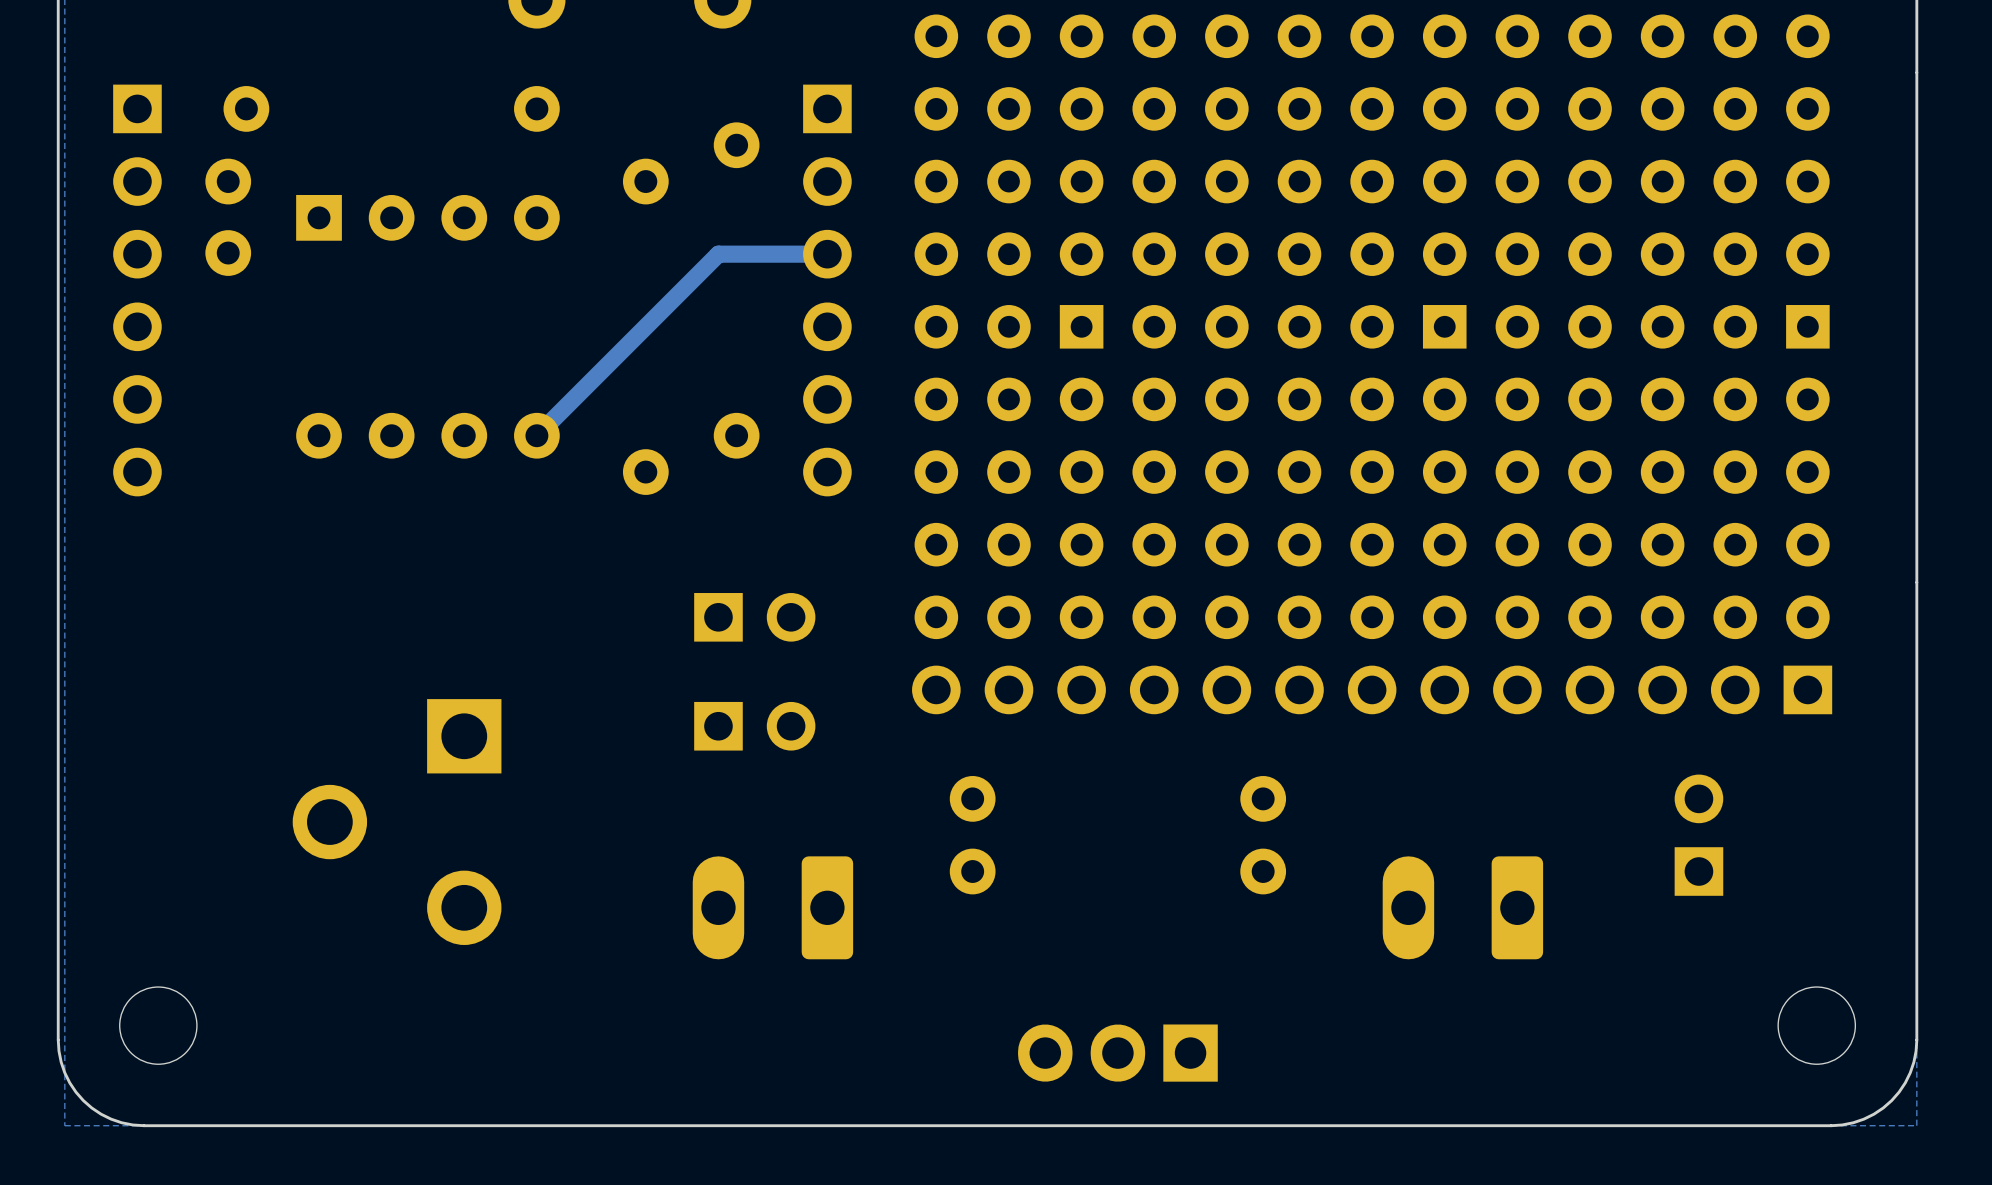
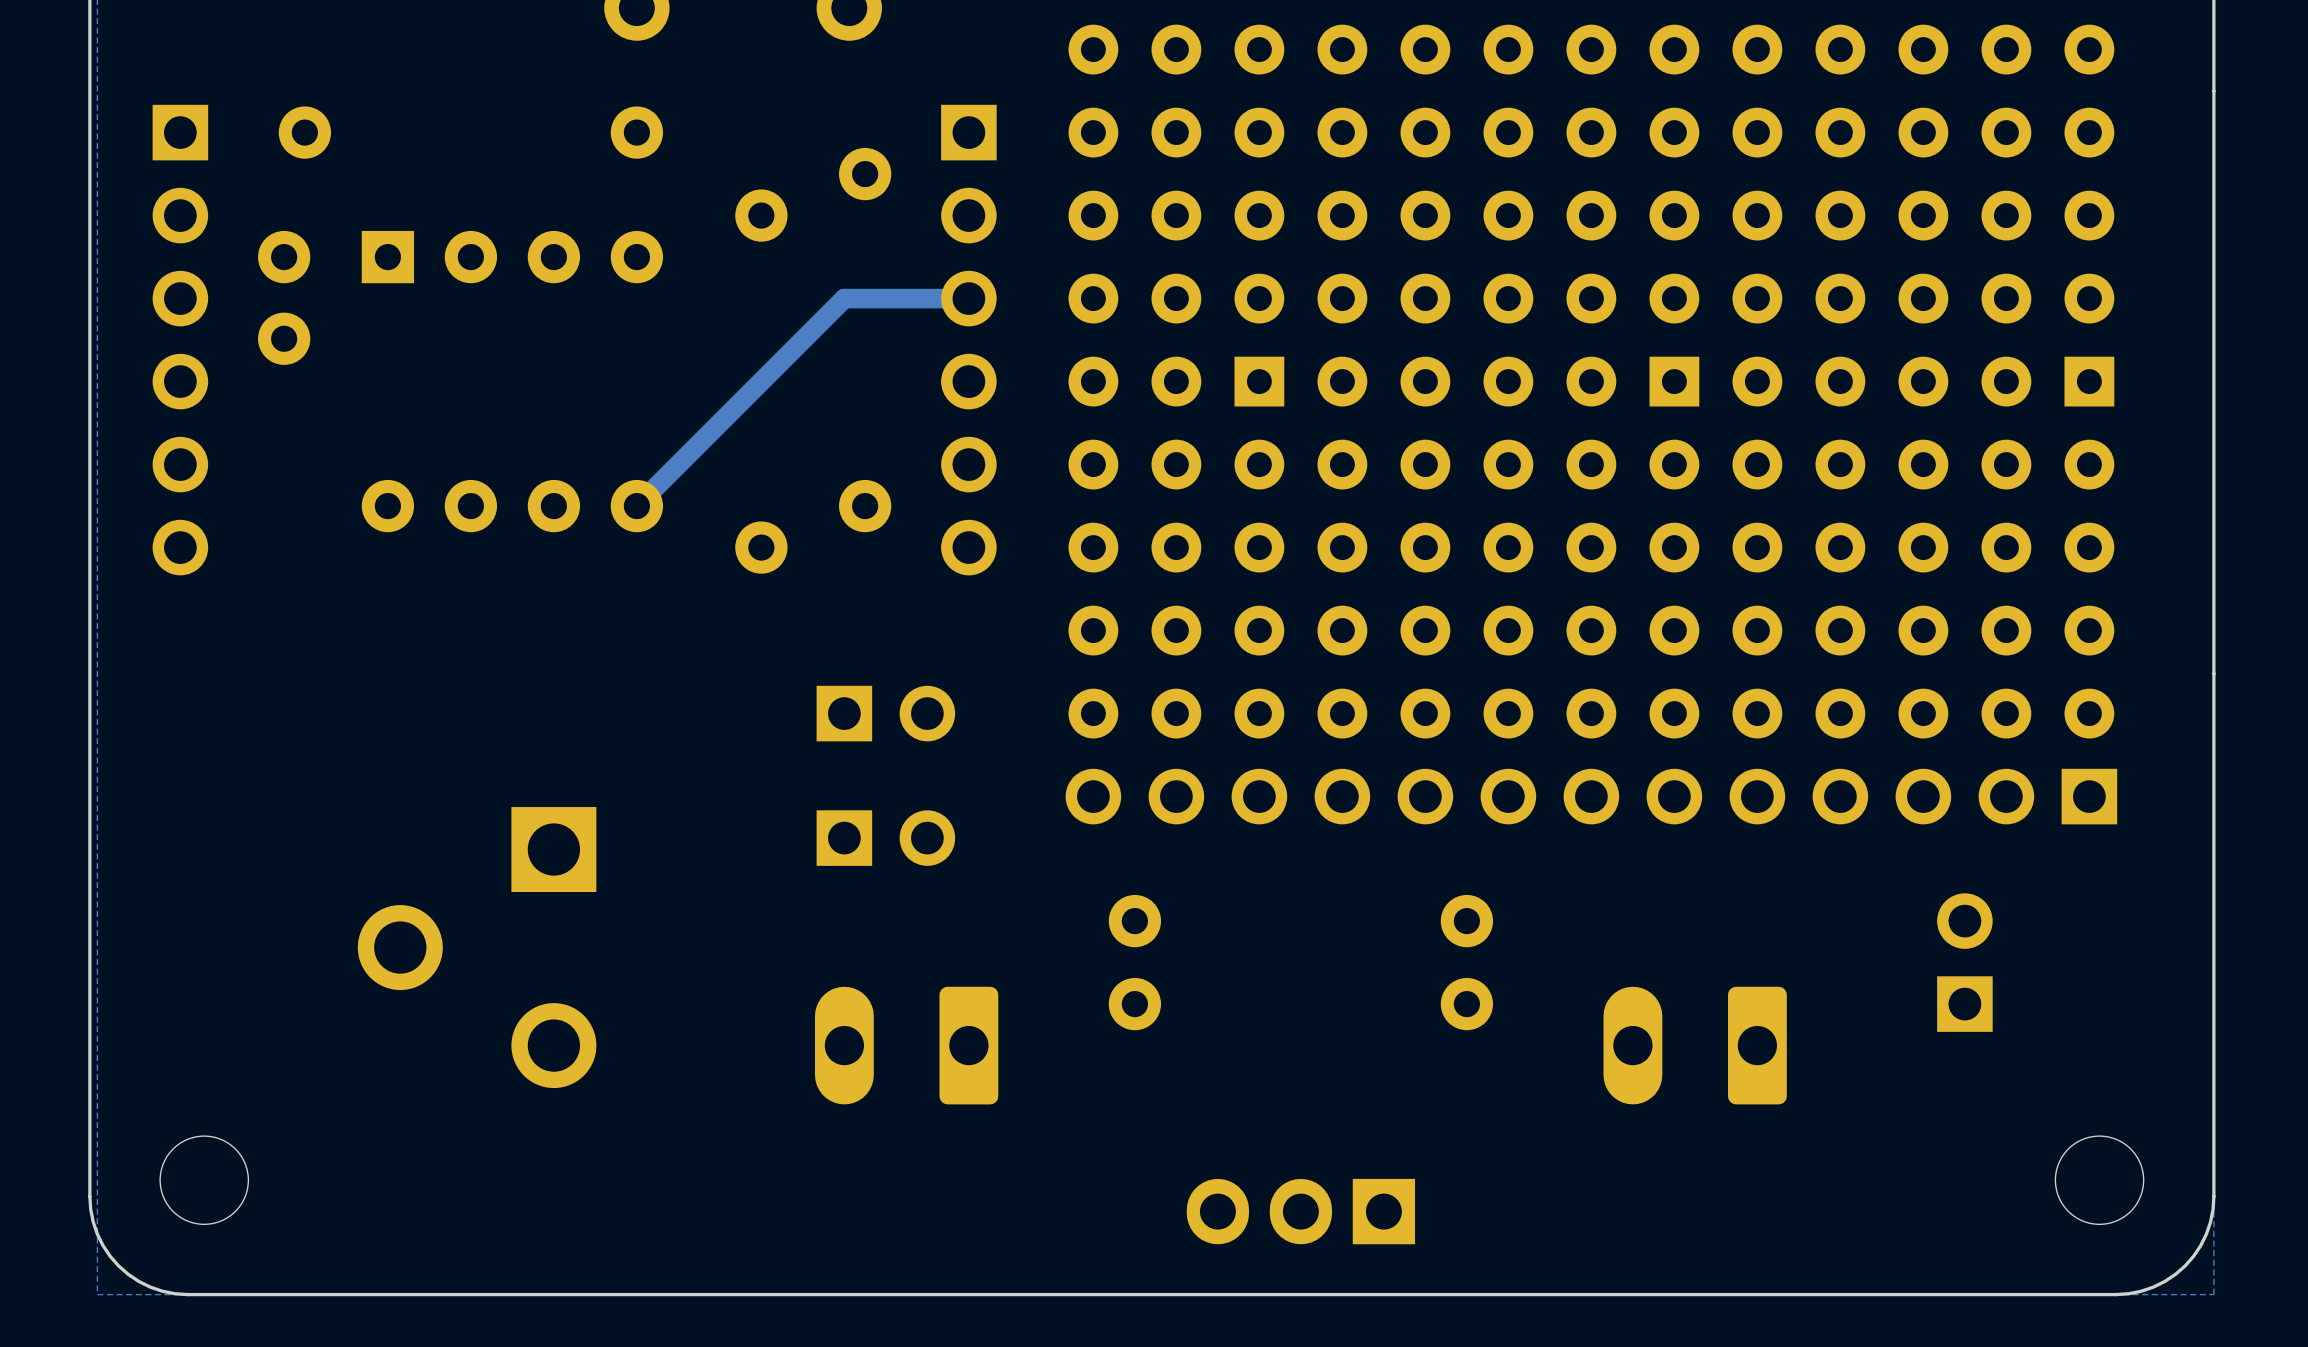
part position: (228, 217) -> (284, 297)

